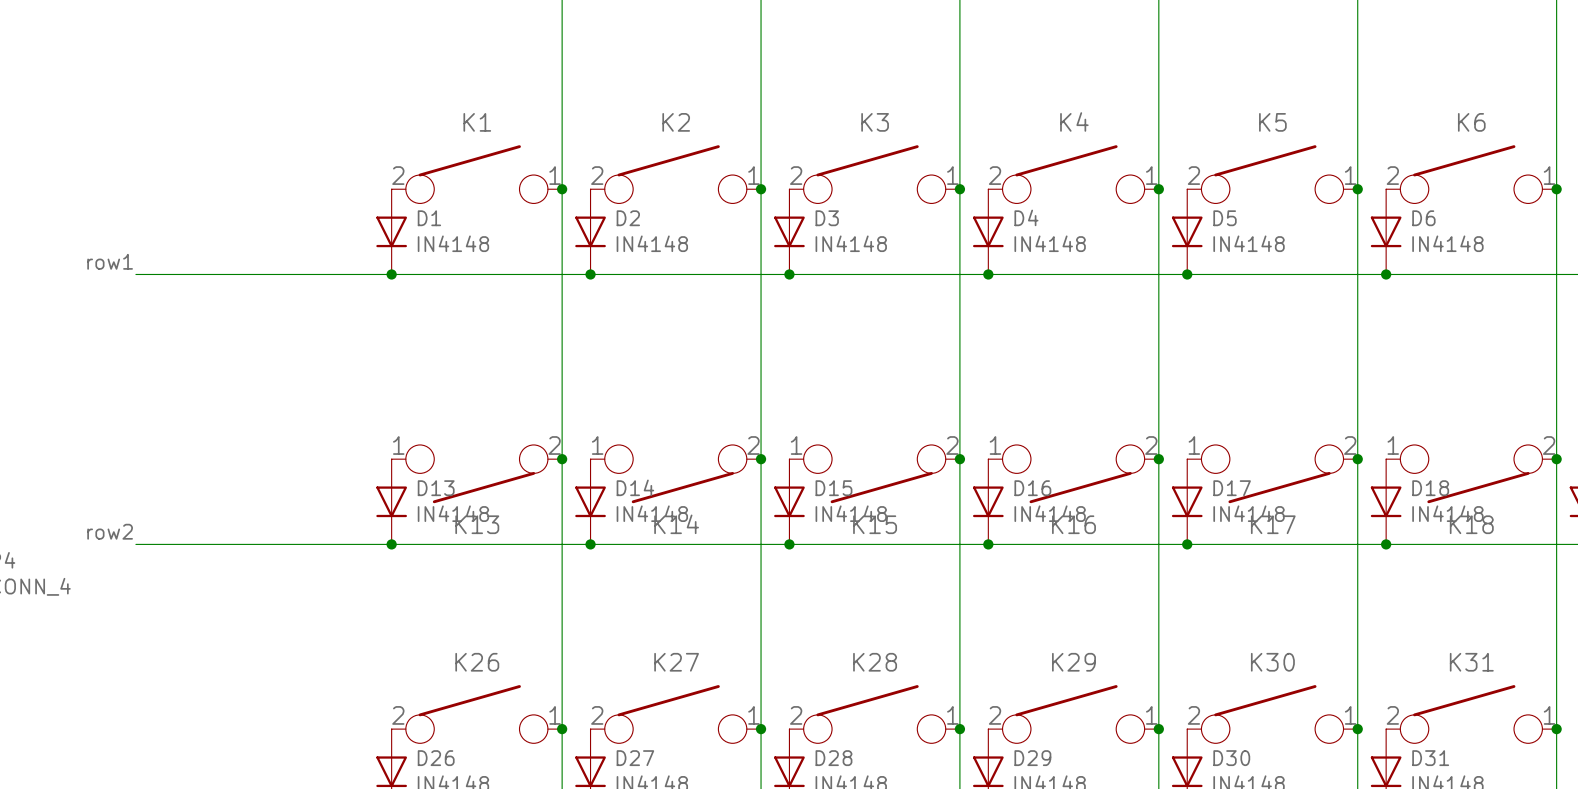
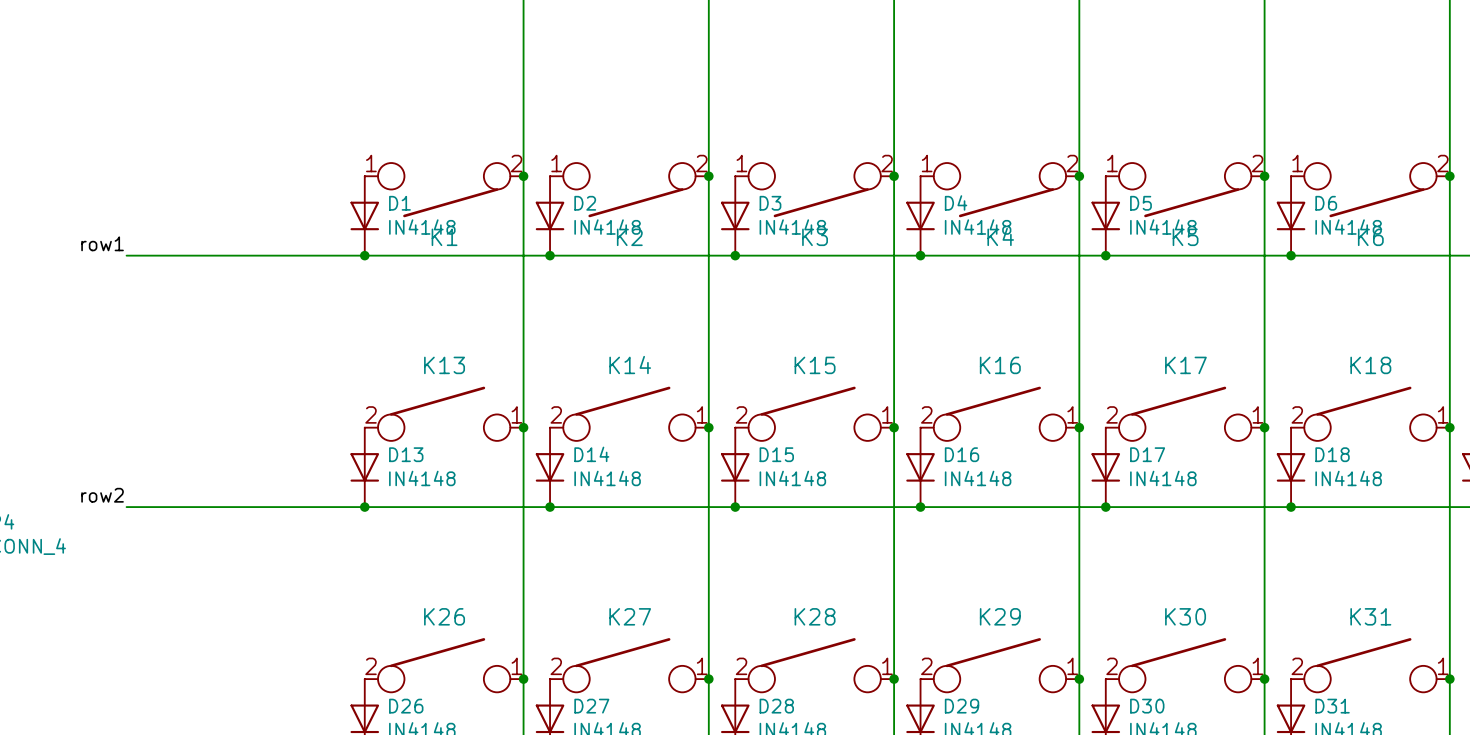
K1 rotation: 0° (476, 174) -> 180° (444, 190)
K2 rotation: 0° (675, 174) -> 180° (629, 190)
K3 rotation: 0° (874, 174) -> 180° (814, 190)
K4 rotation: 0° (1073, 174) -> 180° (999, 190)
K5 rotation: 0° (1272, 174) -> 180° (1185, 190)
K6 rotation: 0° (1471, 174) -> 180° (1370, 190)
K13 rotation: 0° (476, 474) -> 180° (444, 413)
K14 rotation: 0° (675, 474) -> 180° (629, 413)
K15 rotation: 0° (874, 474) -> 180° (814, 413)
K16 rotation: 0° (1073, 474) -> 180° (999, 413)
K17 rotation: 0° (1272, 474) -> 180° (1185, 413)
K18 rotation: 0° (1471, 474) -> 180° (1370, 413)

